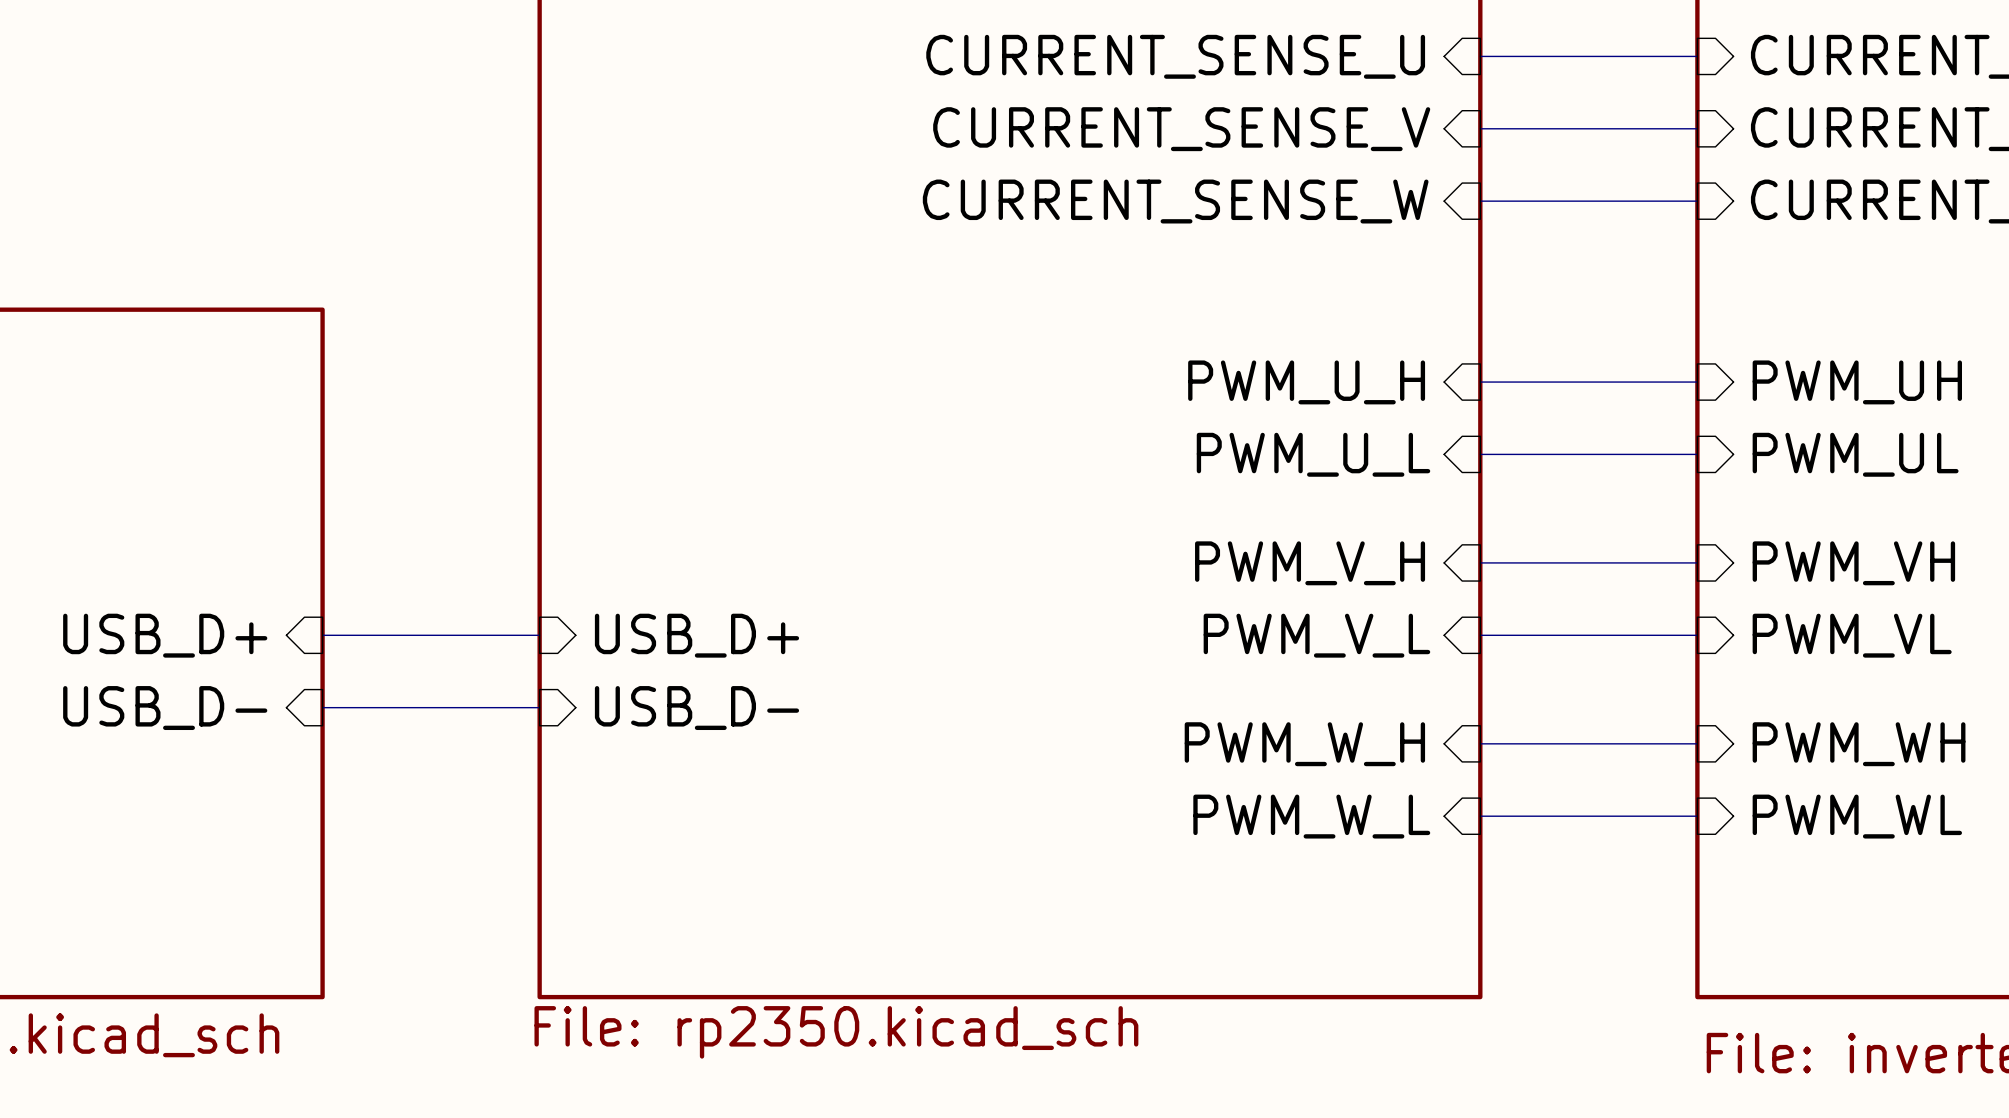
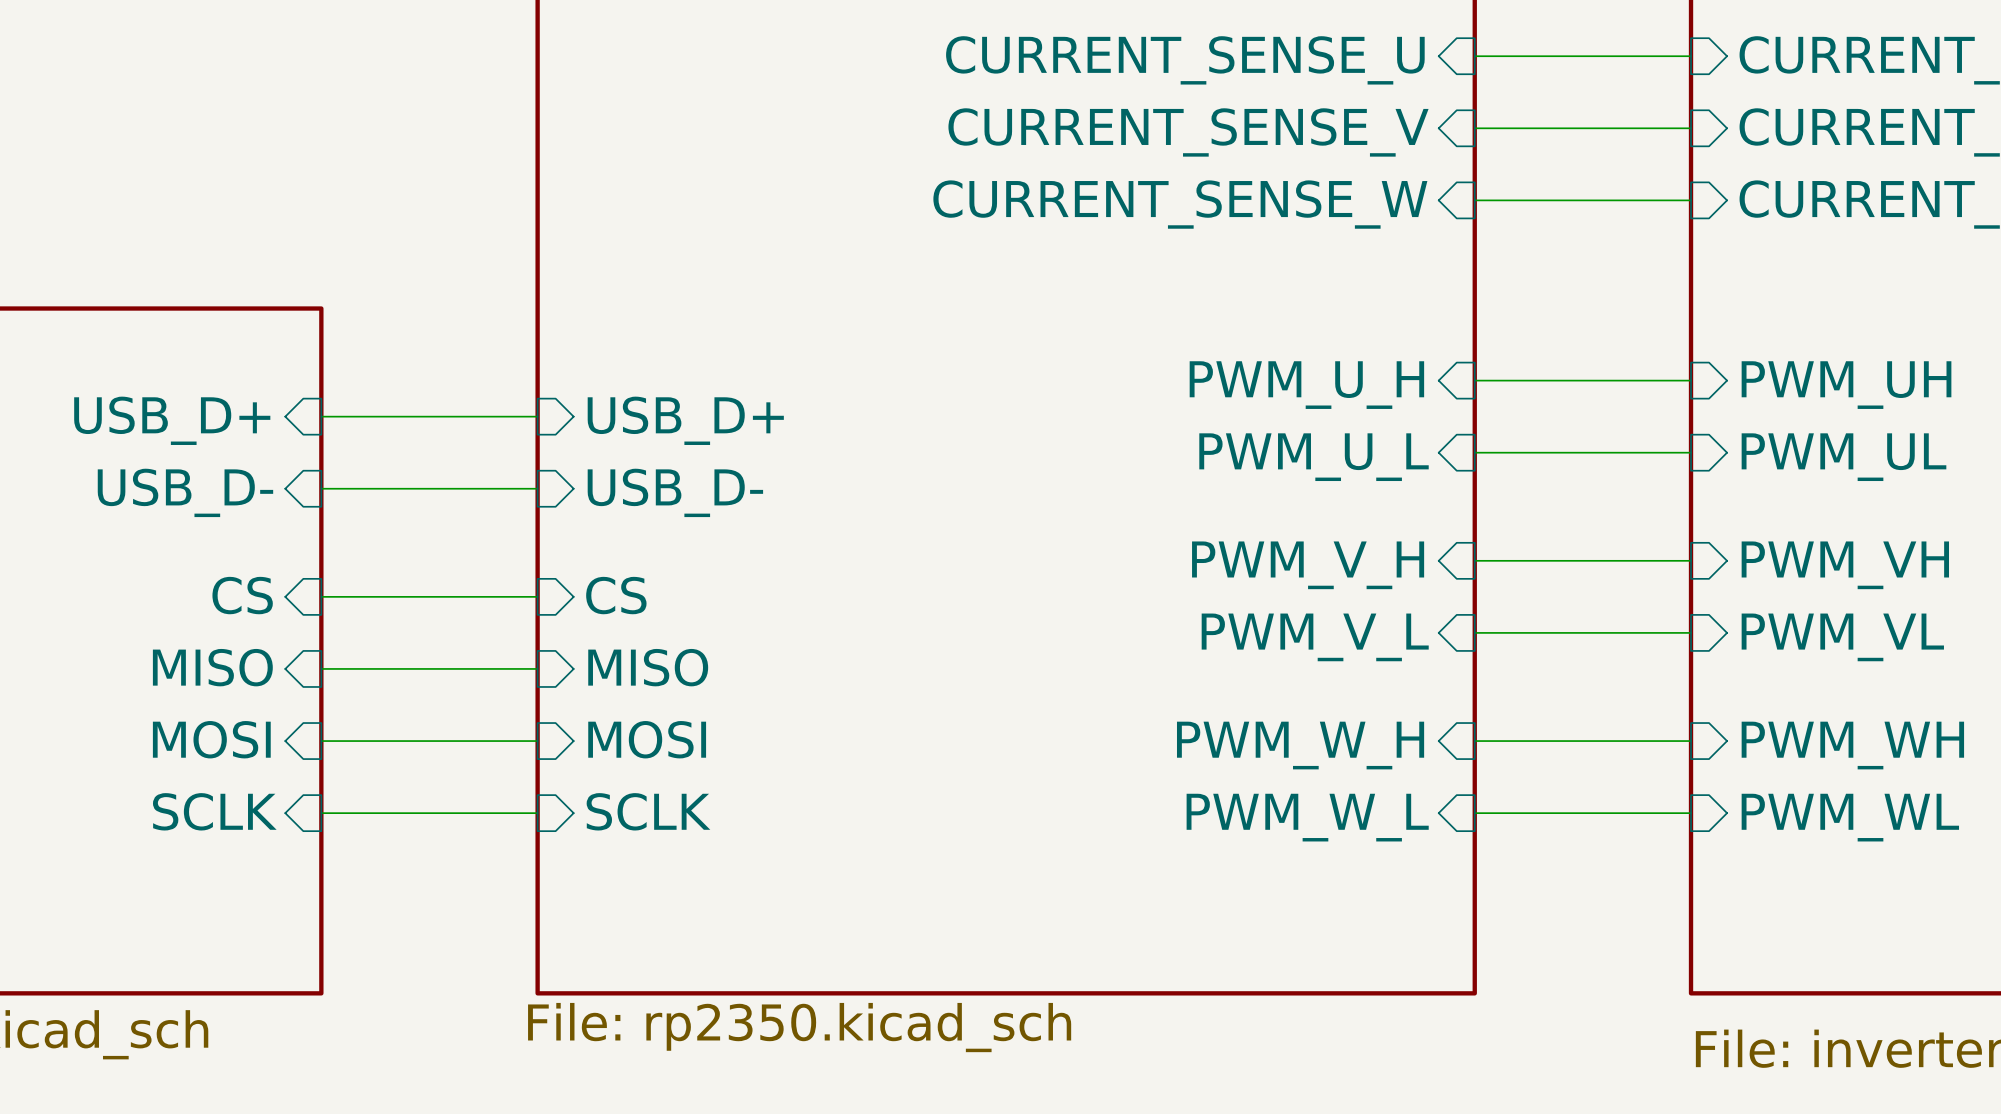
sheet pin: none -> USB_D+ (172, 420)
wire: none -> (321, 416) (537, 416)
sheet pin: none -> USB_D+ (685, 420)
sheet pin: none -> USB_D- (185, 492)
wire: none -> (321, 488) (537, 488)
sheet pin: none -> USB_D- (675, 492)
sheet pin: none -> CS (242, 595)
sheet pin: none -> CS (616, 595)
wire: none -> (321, 596) (537, 596)
sheet pin: USB_D+ (165, 635) -> none
wire: (322, 635) (539, 635) -> (321, 668) (537, 668)
sheet pin: USB_D+ (696, 635) -> none
sheet pin: none -> MISO (212, 667)
sheet pin: none -> MISO (648, 667)
wire: (322, 707) (539, 707) -> (321, 741) (537, 741)
sheet pin: USB_D- (165, 708) -> none
sheet pin: USB_D- (696, 708) -> none
sheet pin: none -> MOSI (211, 739)
sheet pin: none -> MOSI (647, 739)
sheet pin: none -> SCLK (214, 811)
sheet pin: none -> SCLK (648, 811)
wire: none -> (321, 813) (537, 813)

